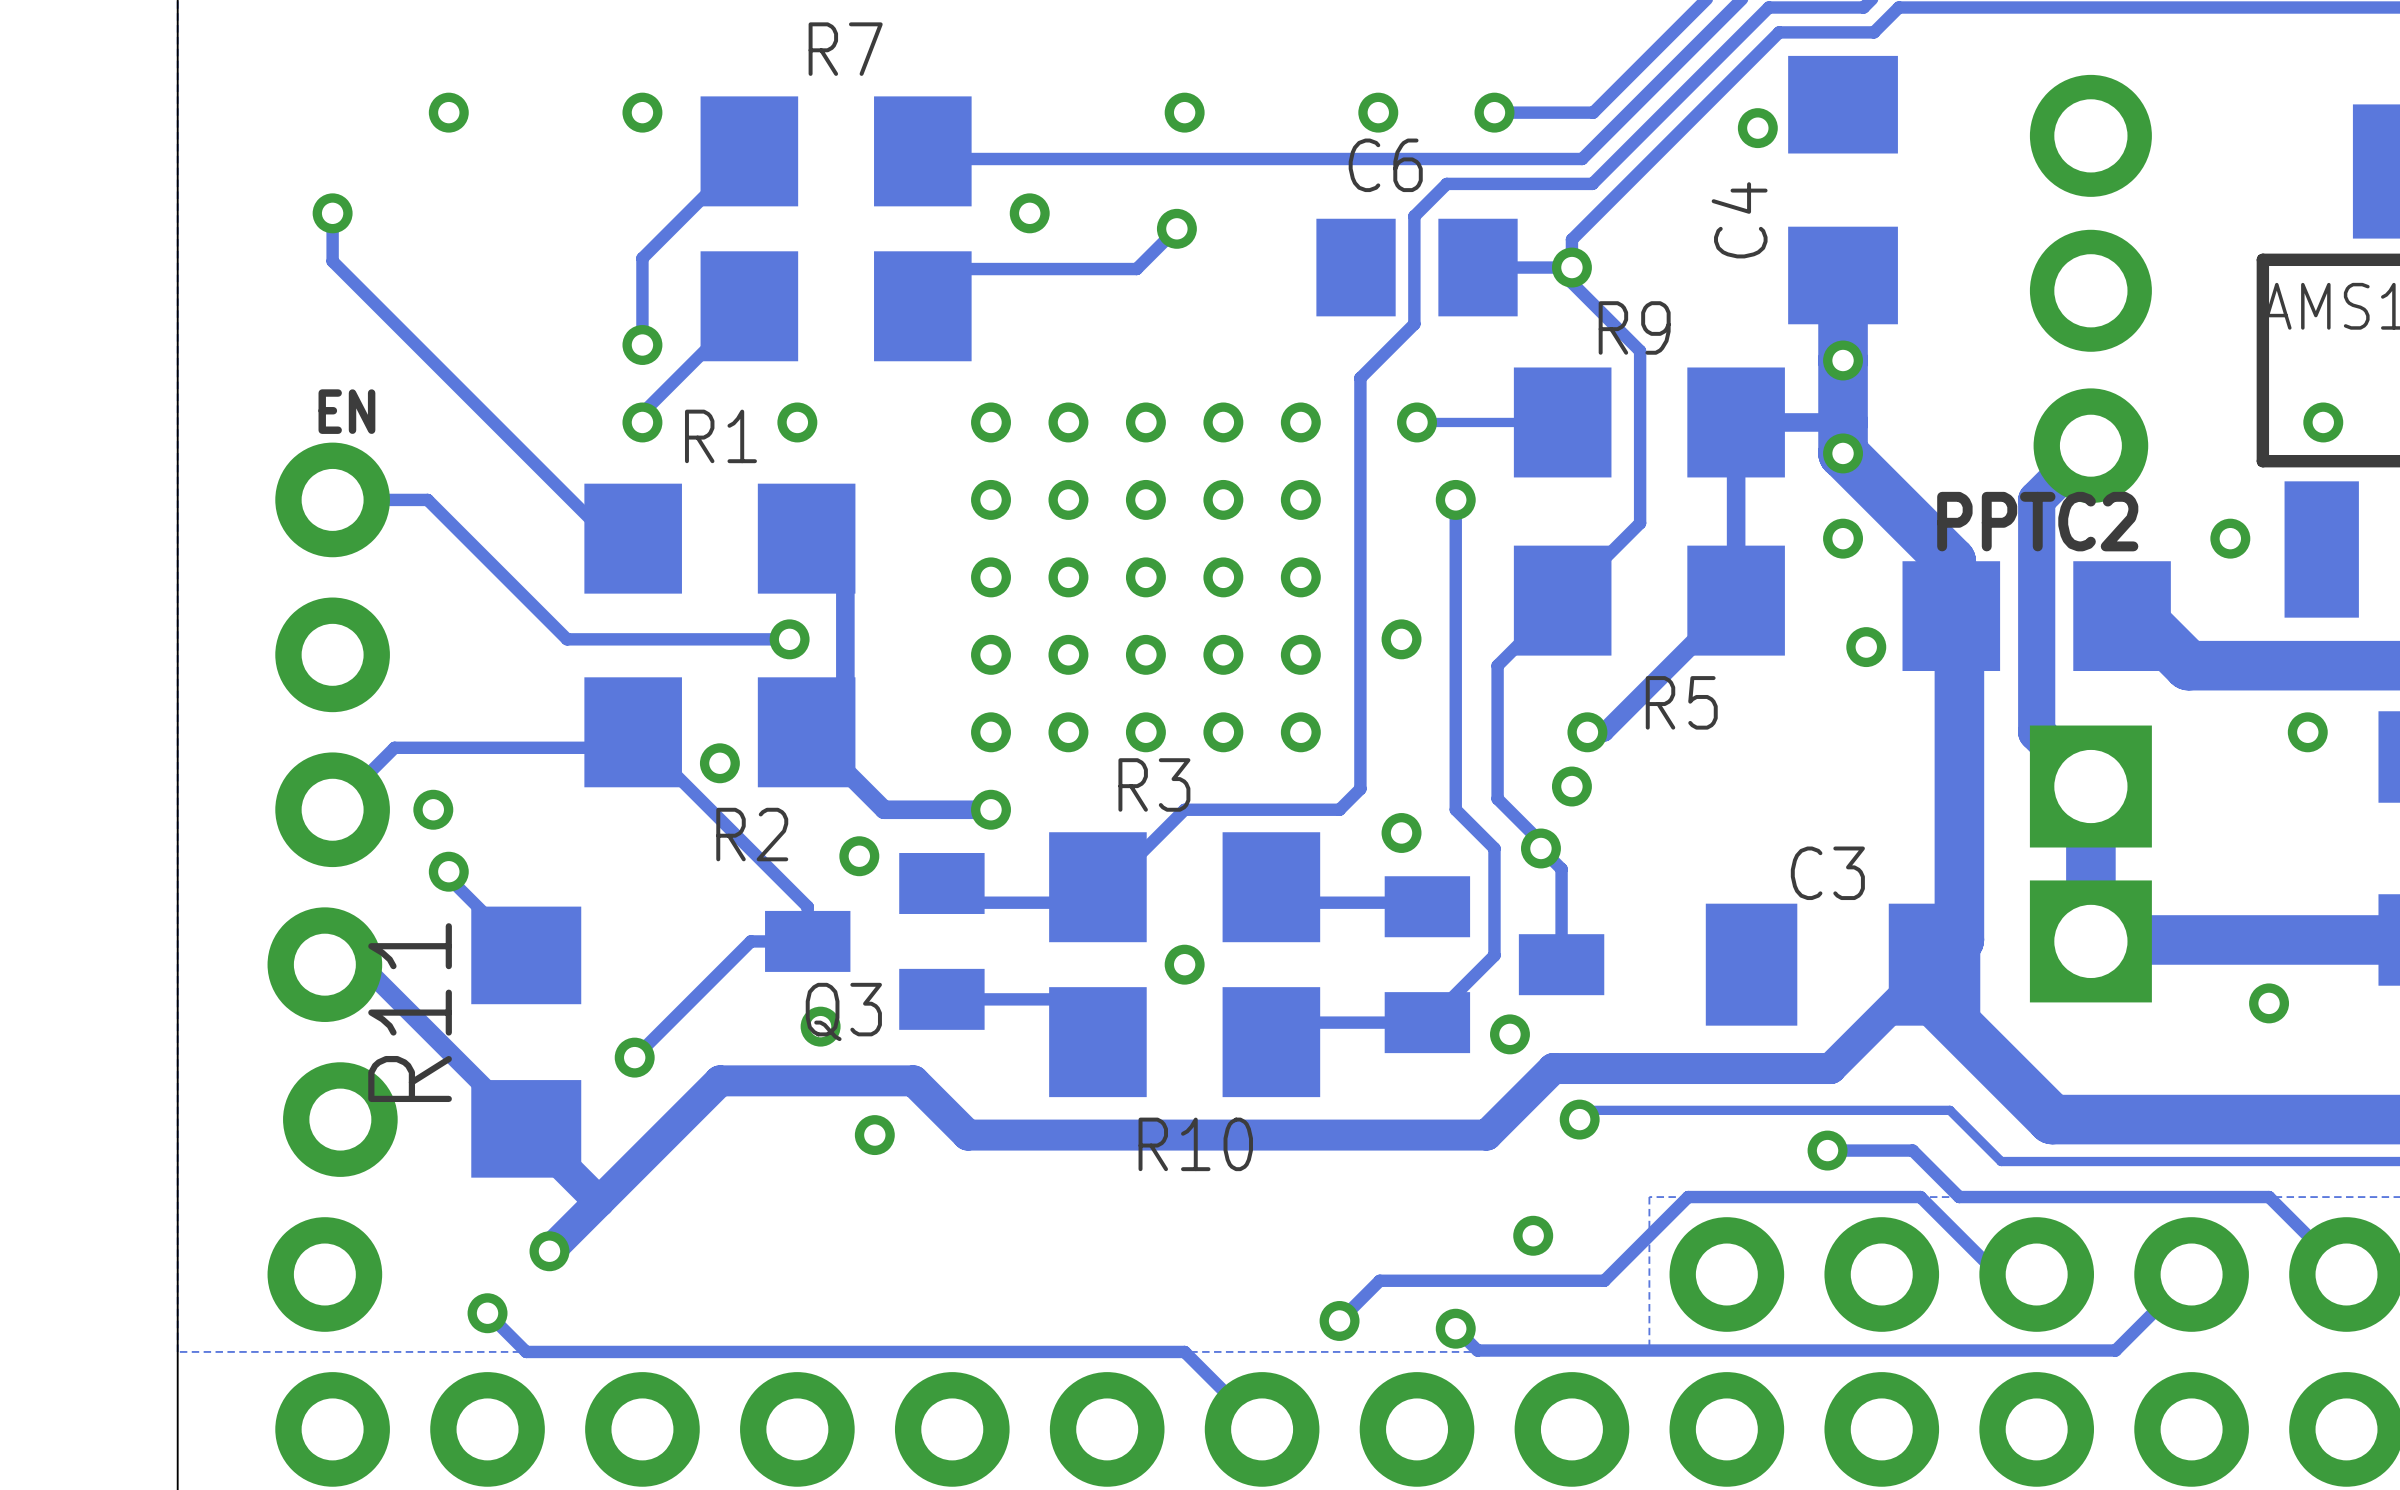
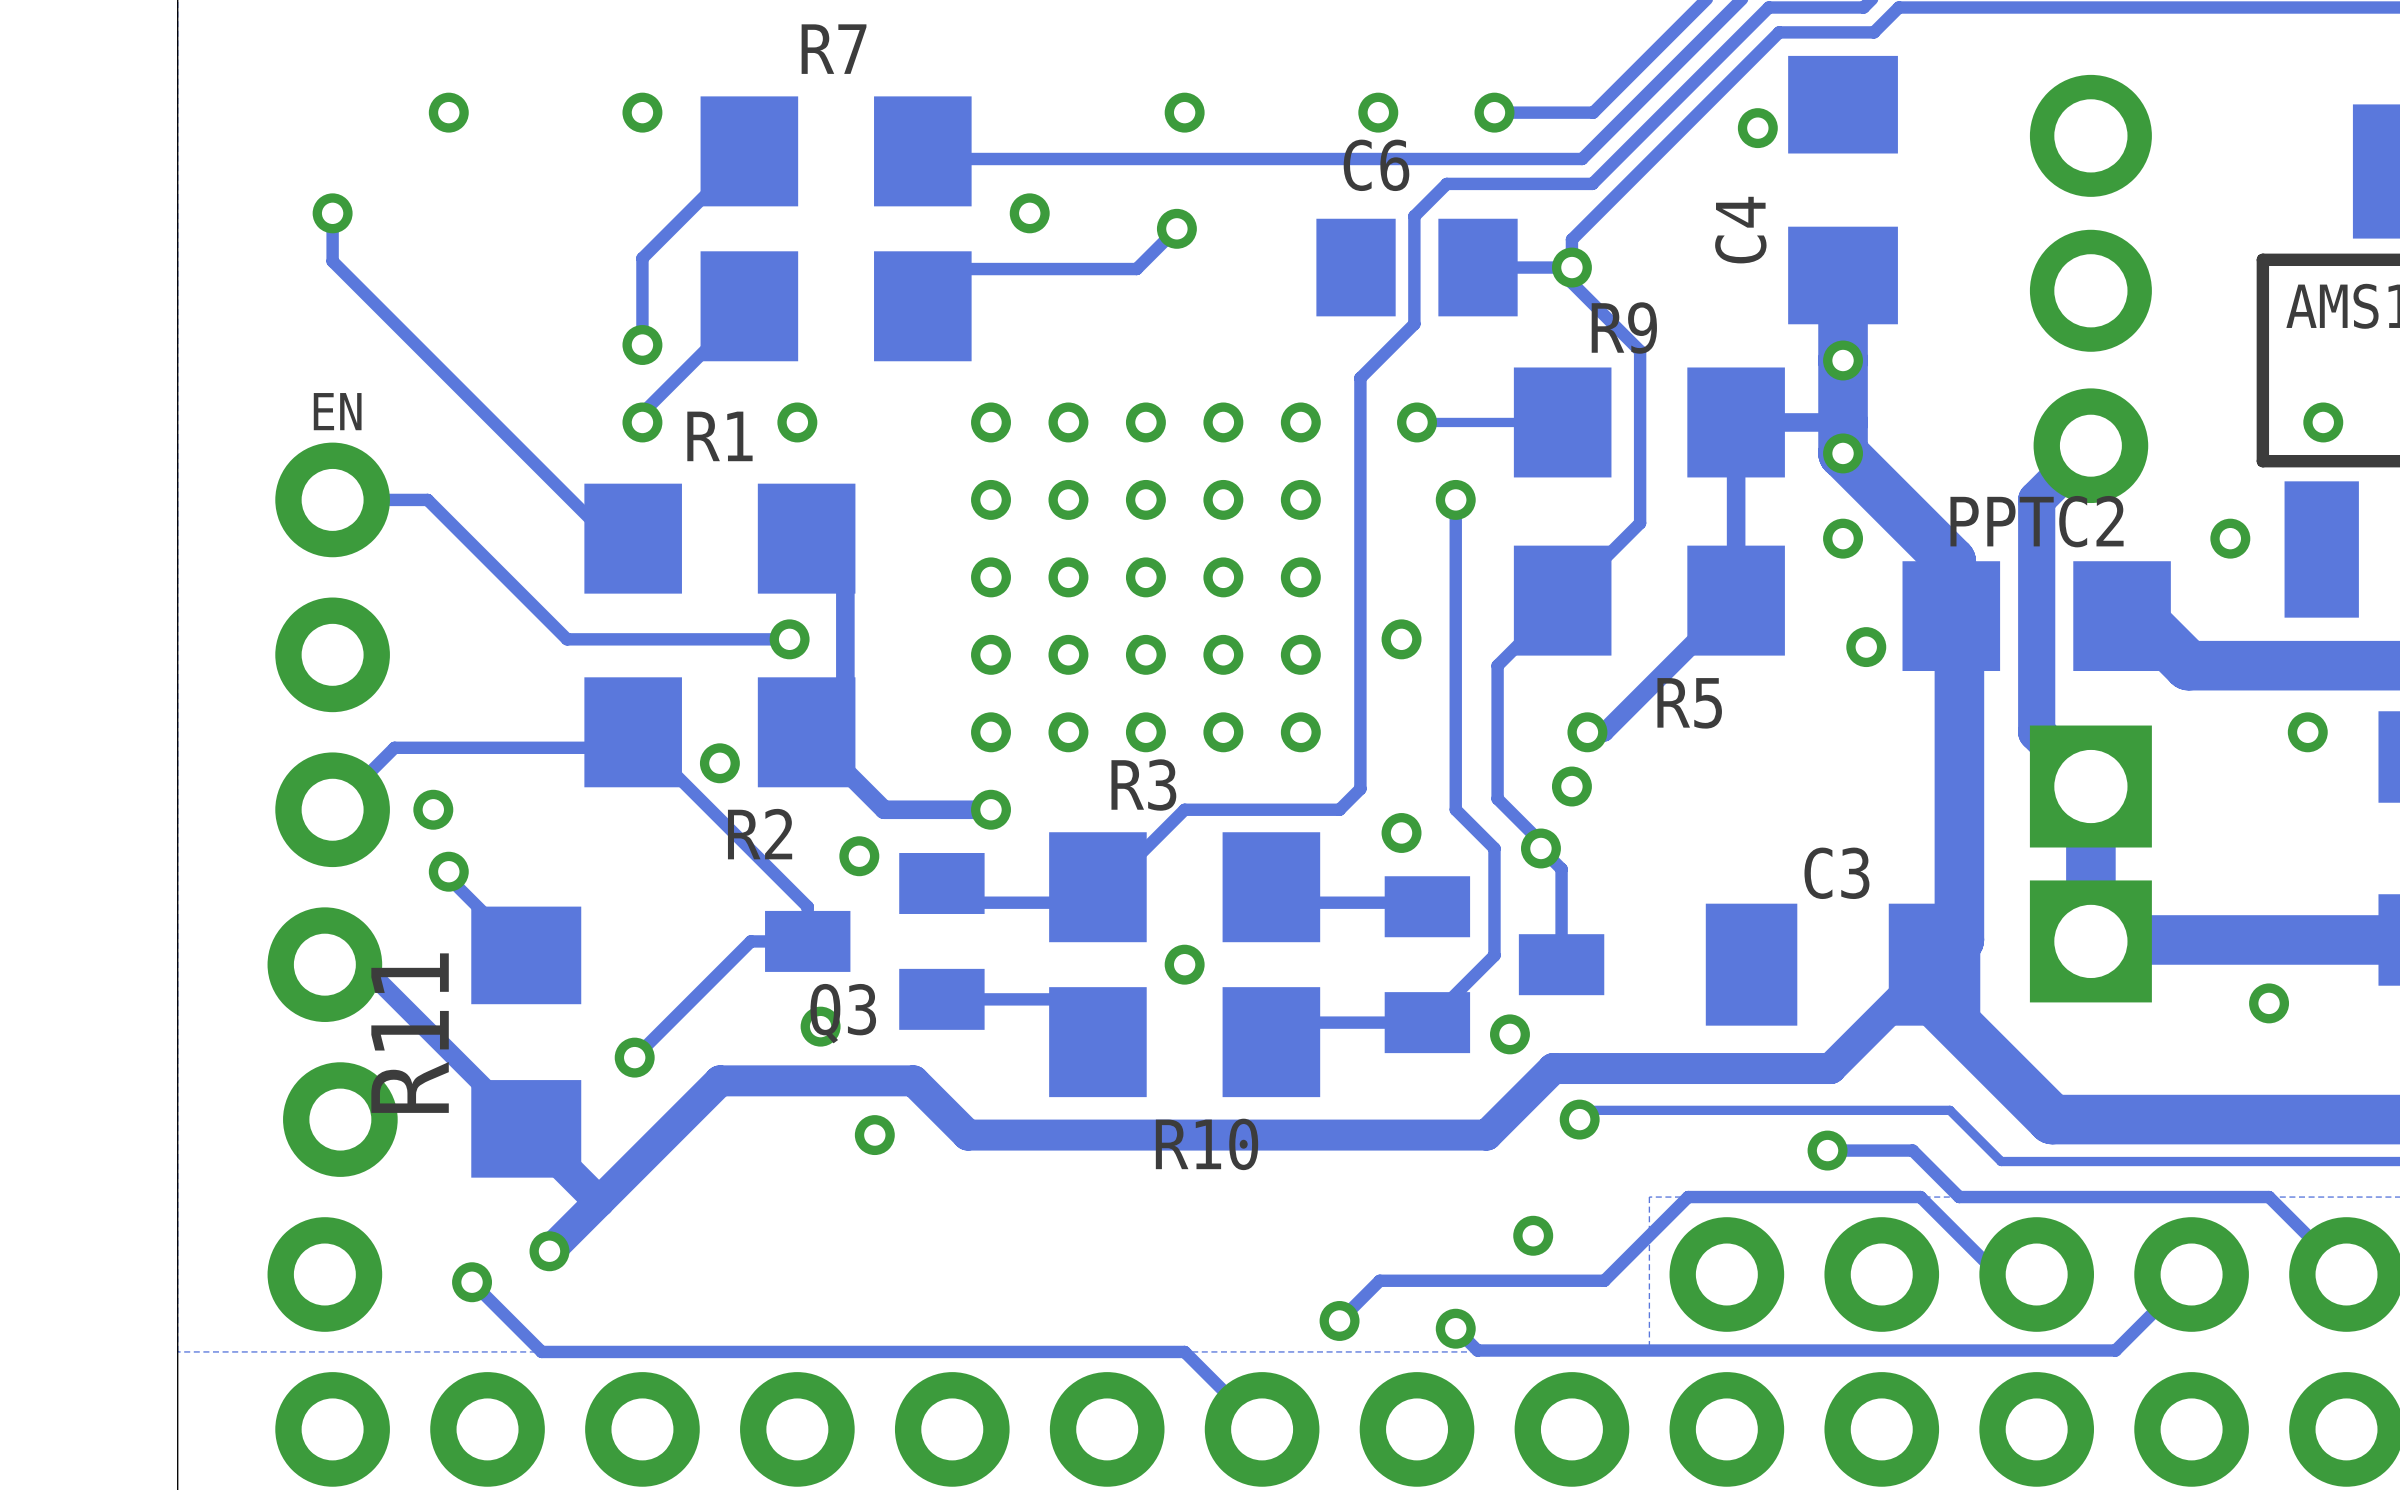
track: (487, 1313) (526, 1351) (541, 1351) -> (472, 1282) (541, 1351)
via position: (487, 1313) -> (472, 1282)

